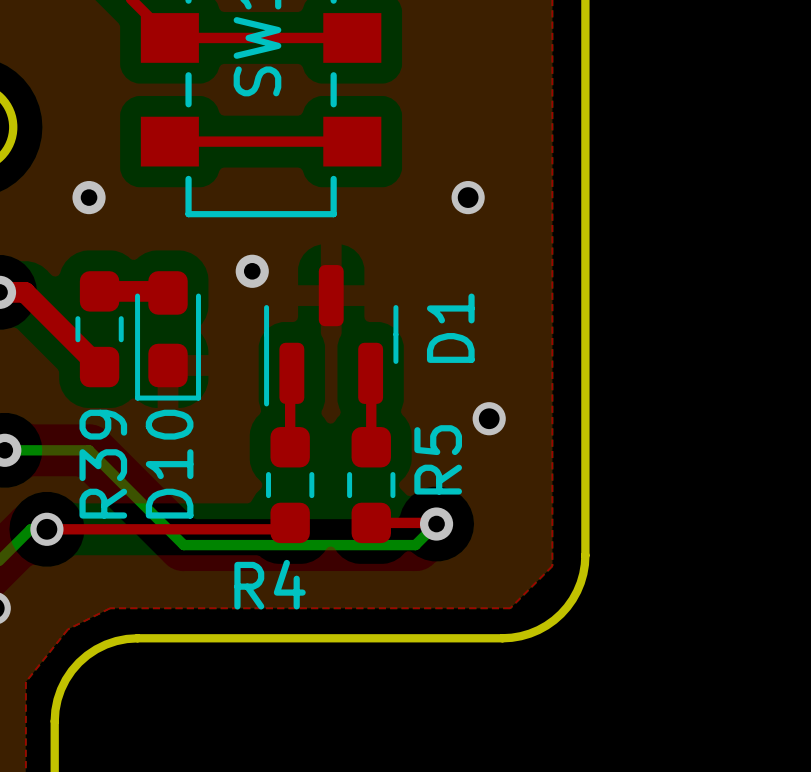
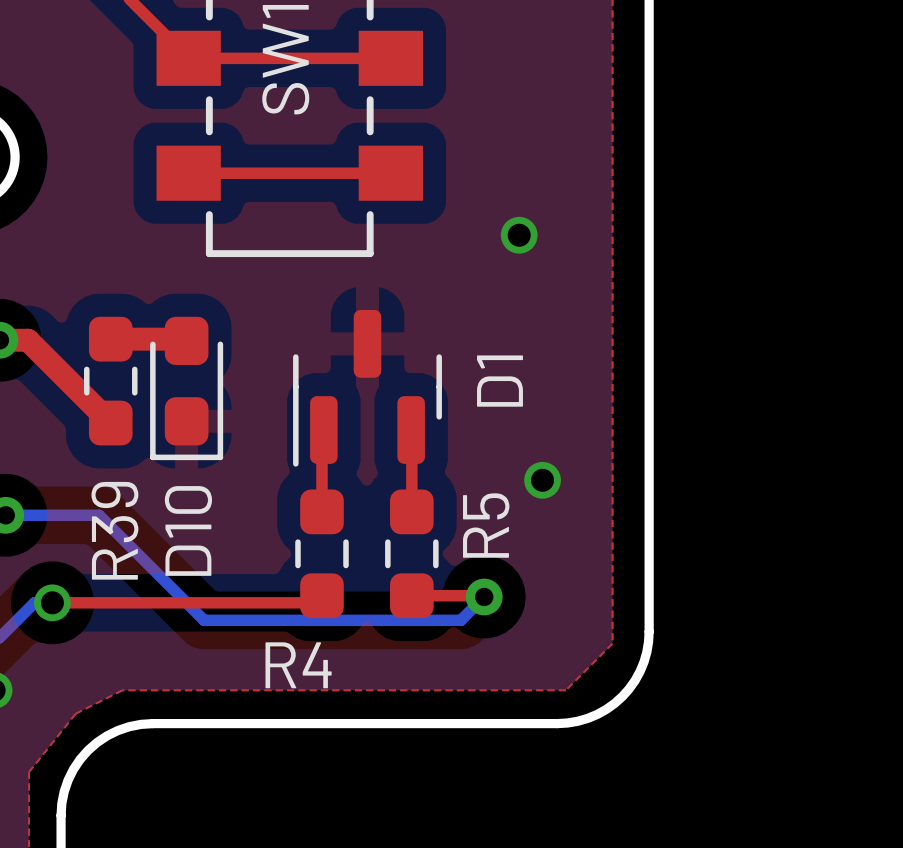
via: (89, 197) -> none
via: (252, 271) -> none

